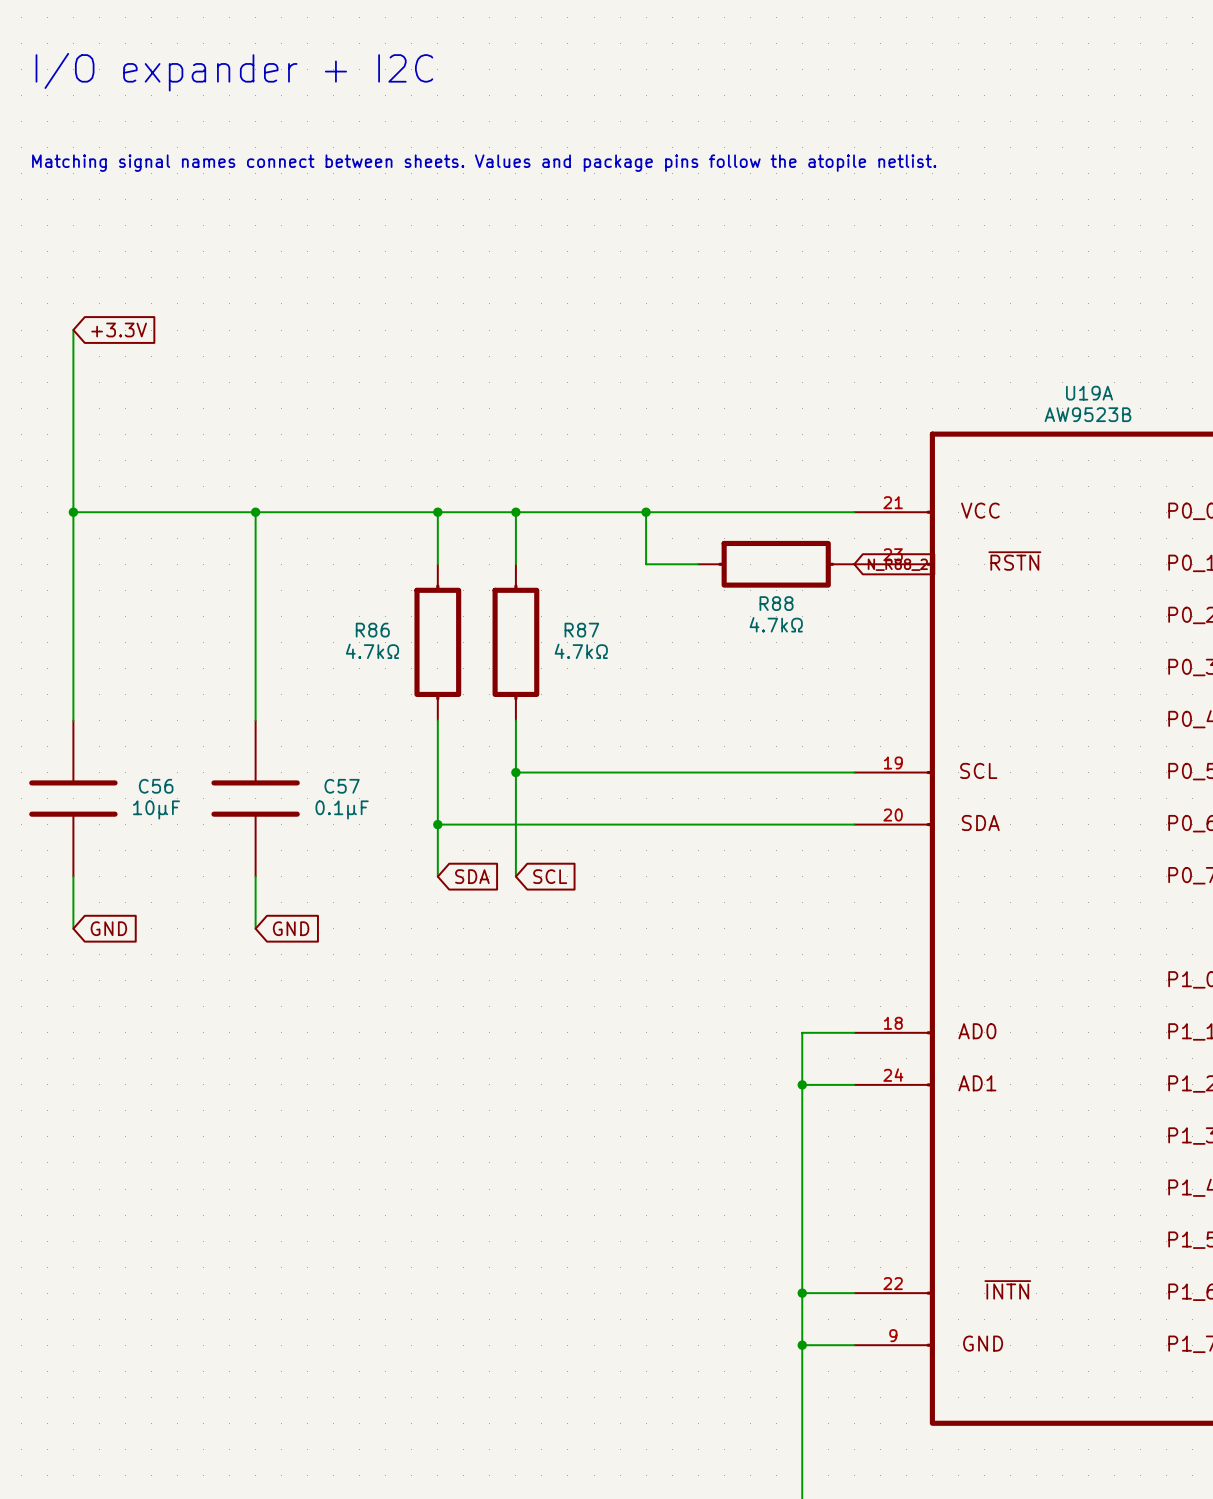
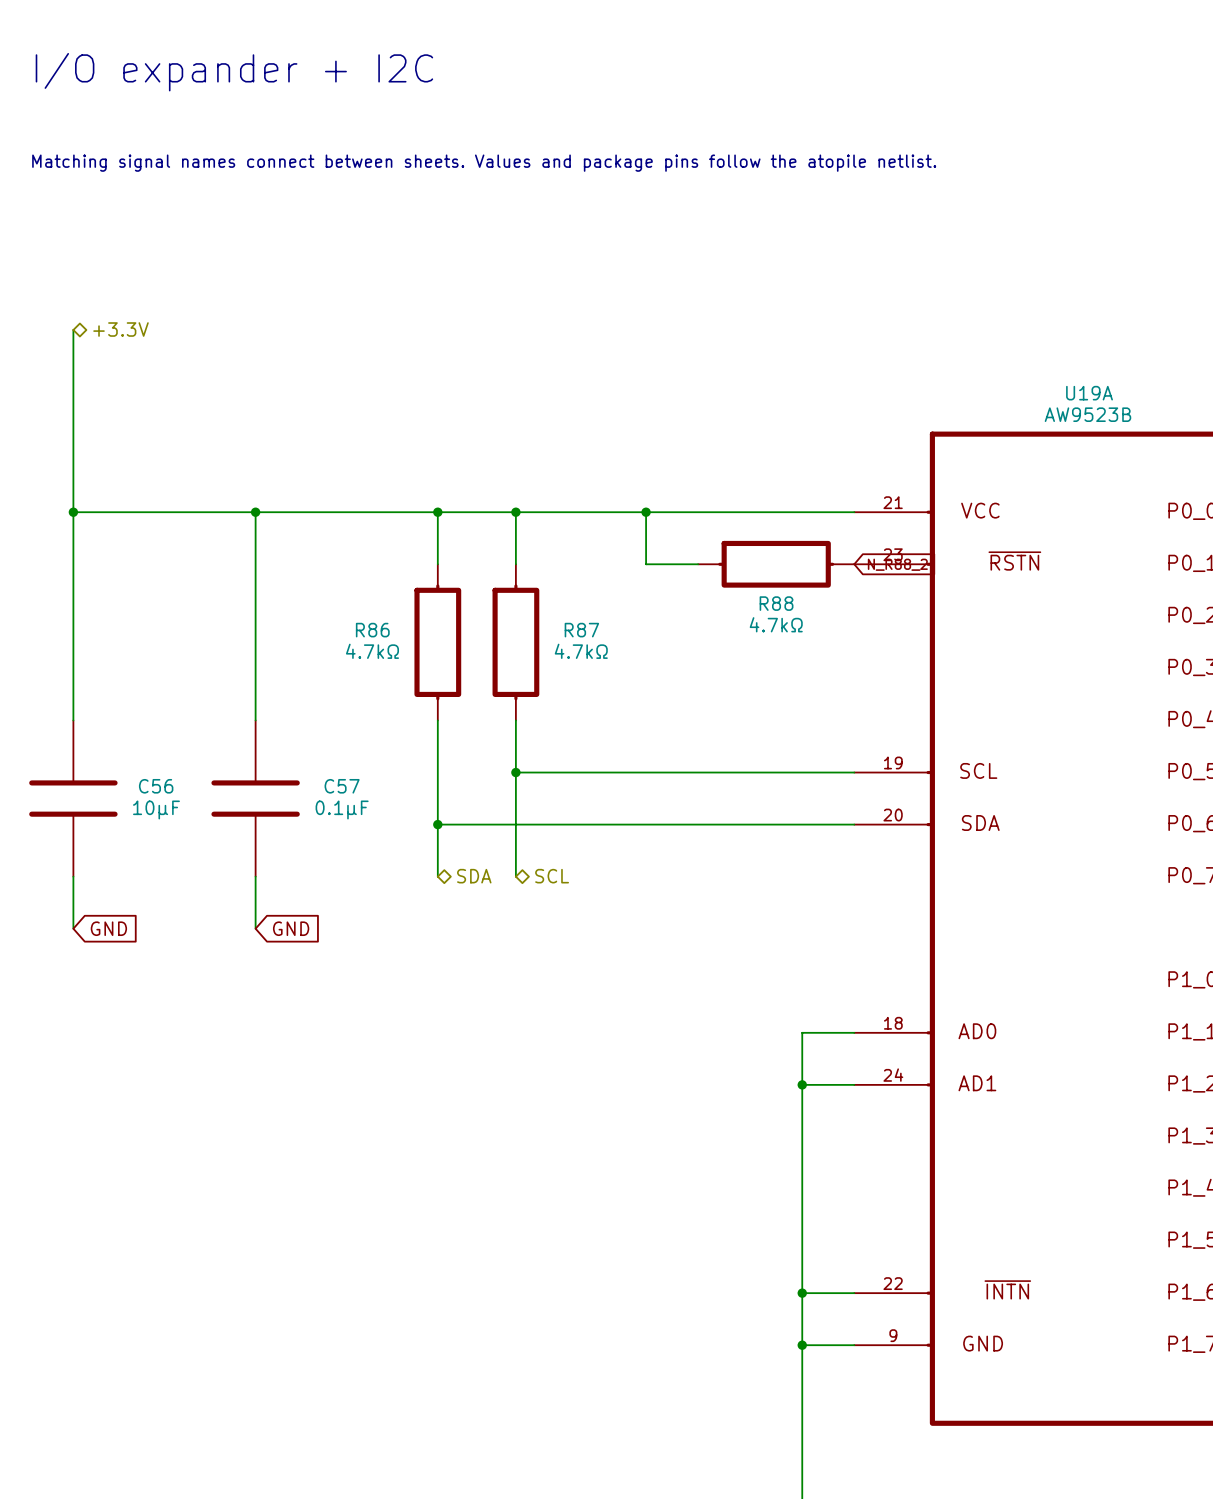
hierarchical label: none -> +3.3V (121, 329)
global label: +3.3V (119, 330) -> none
global label: SDA (472, 876) -> none
hierarchical label: none -> SDA (474, 876)
global label: SCL (550, 876) -> none
hierarchical label: none -> SCL (552, 876)

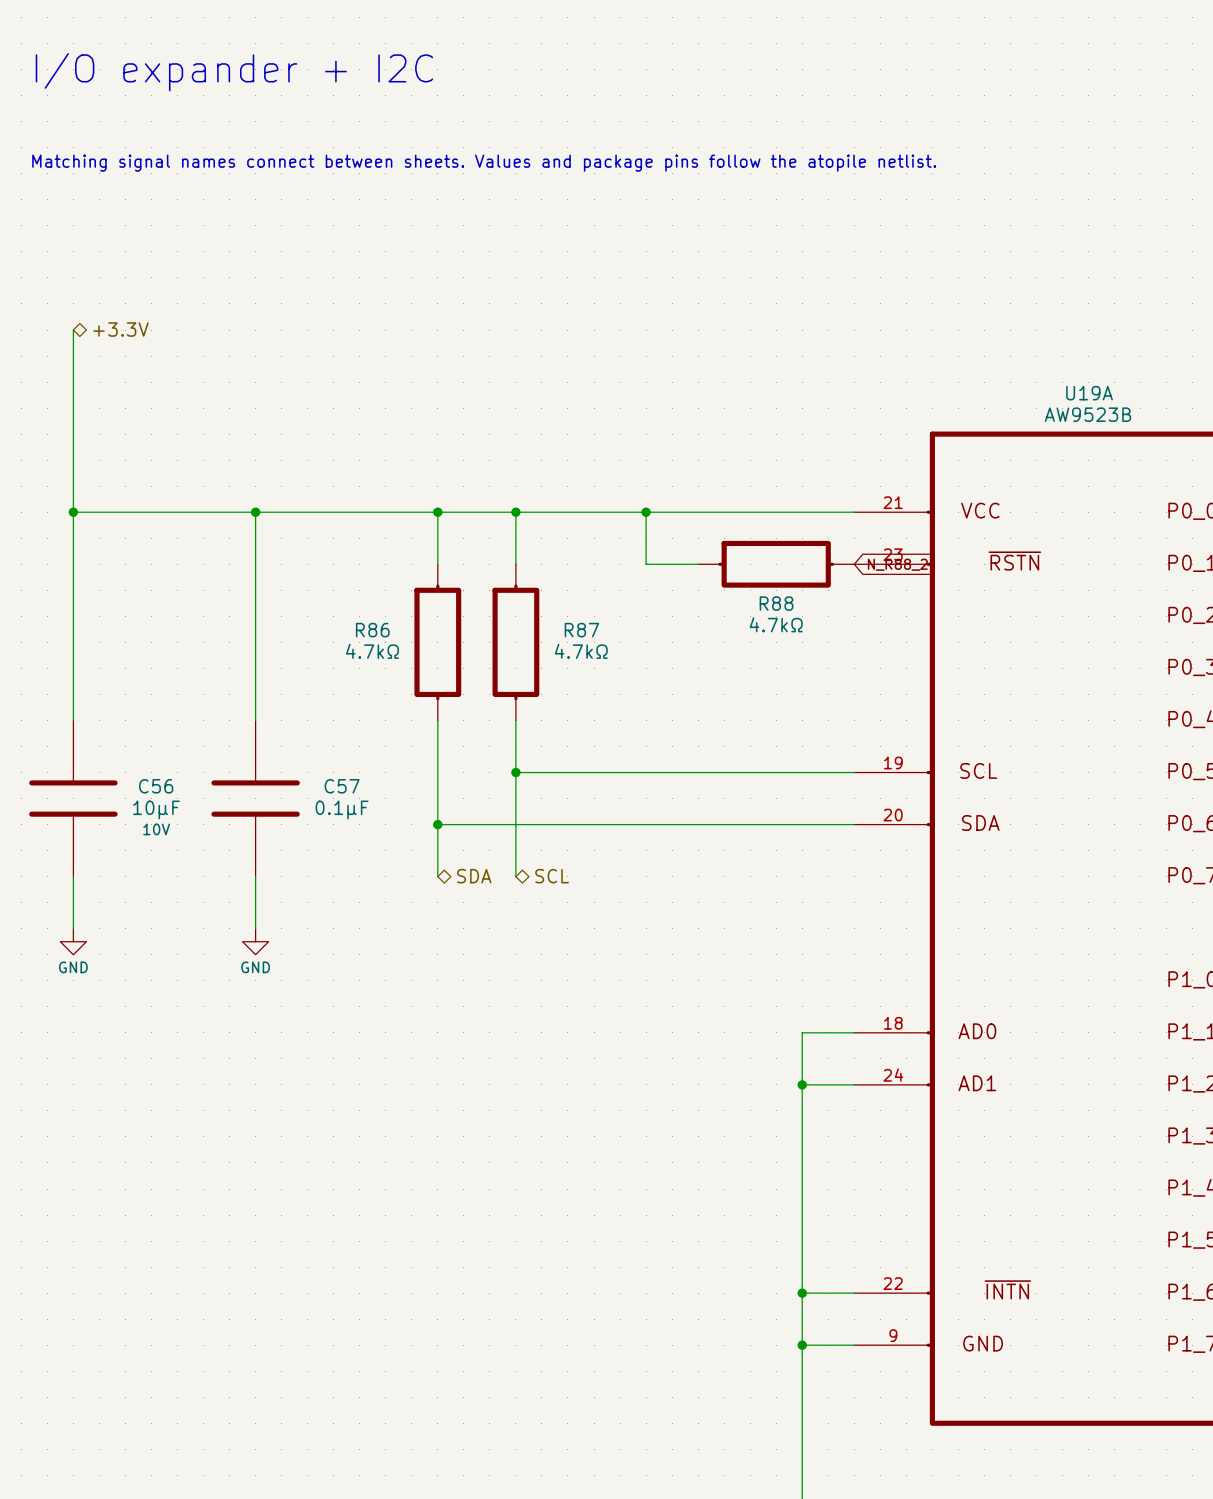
C56 text: none -> 10V (156, 829)
global label: GND (108, 928) -> none
global label: GND (291, 928) -> none
power symbol: none -> GND (73, 941)
power symbol: none -> GND (255, 941)

